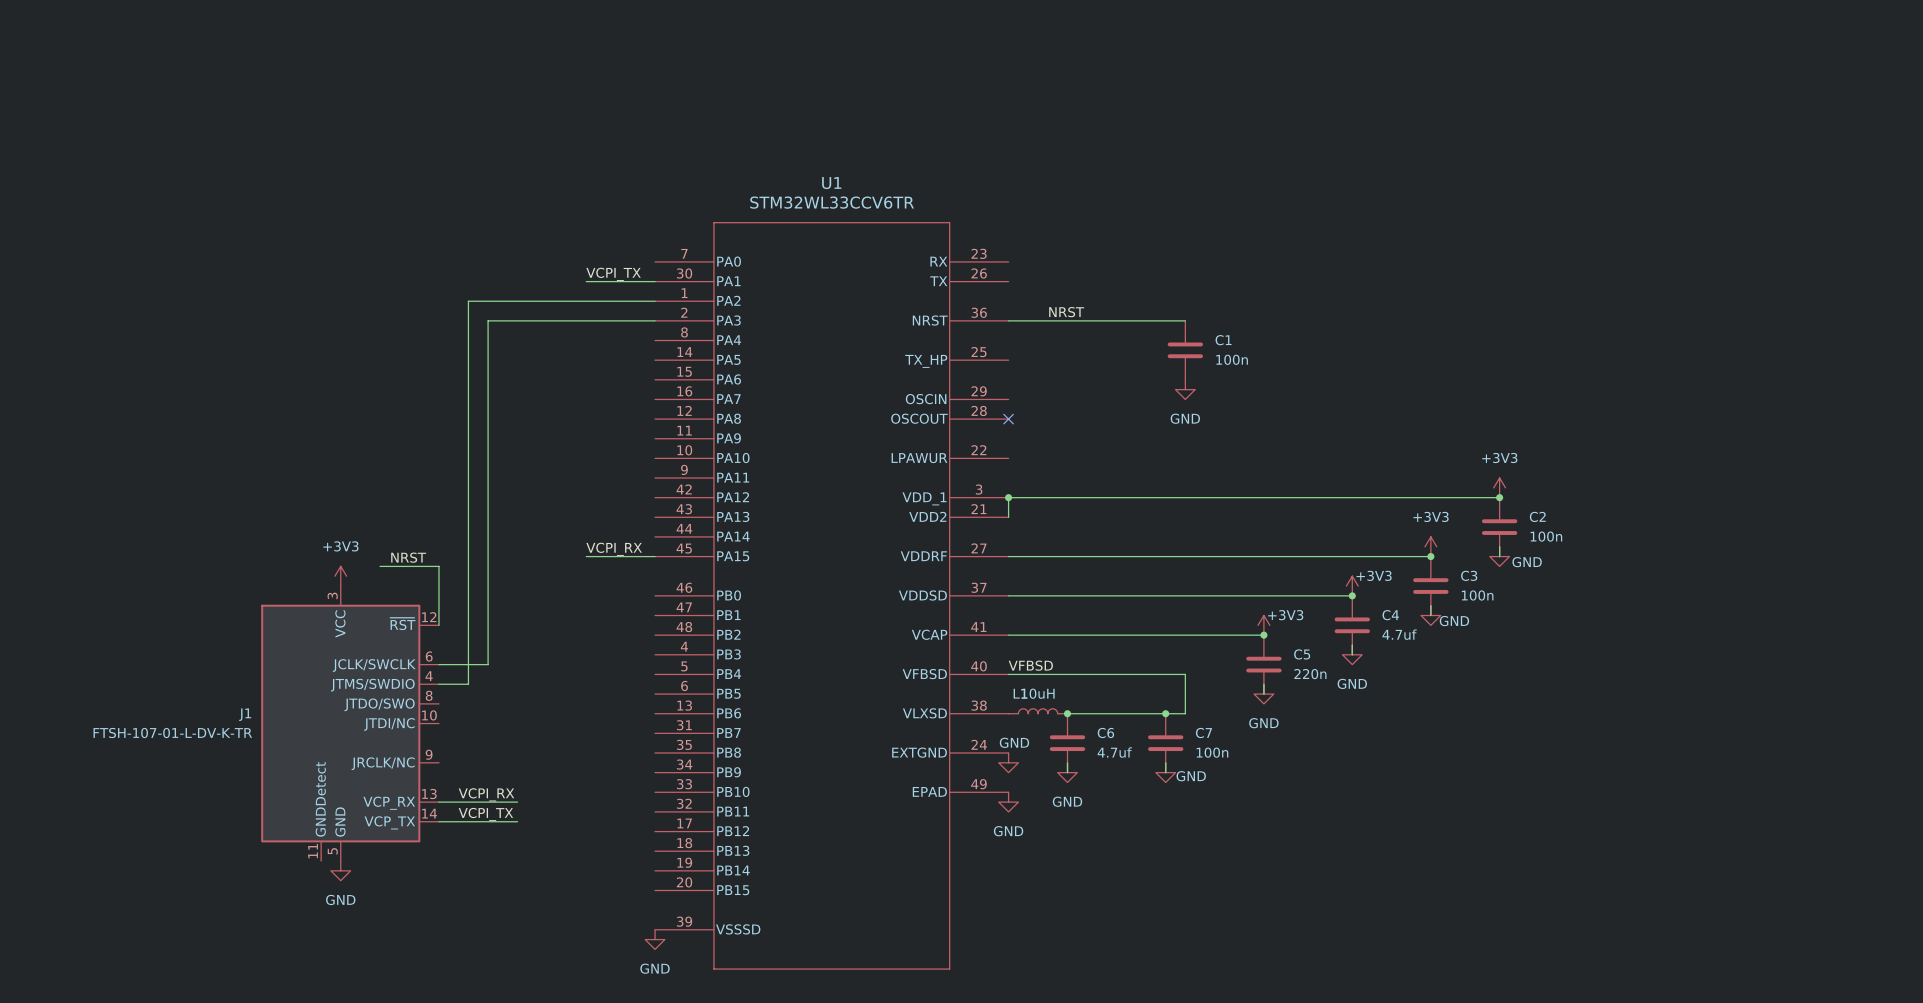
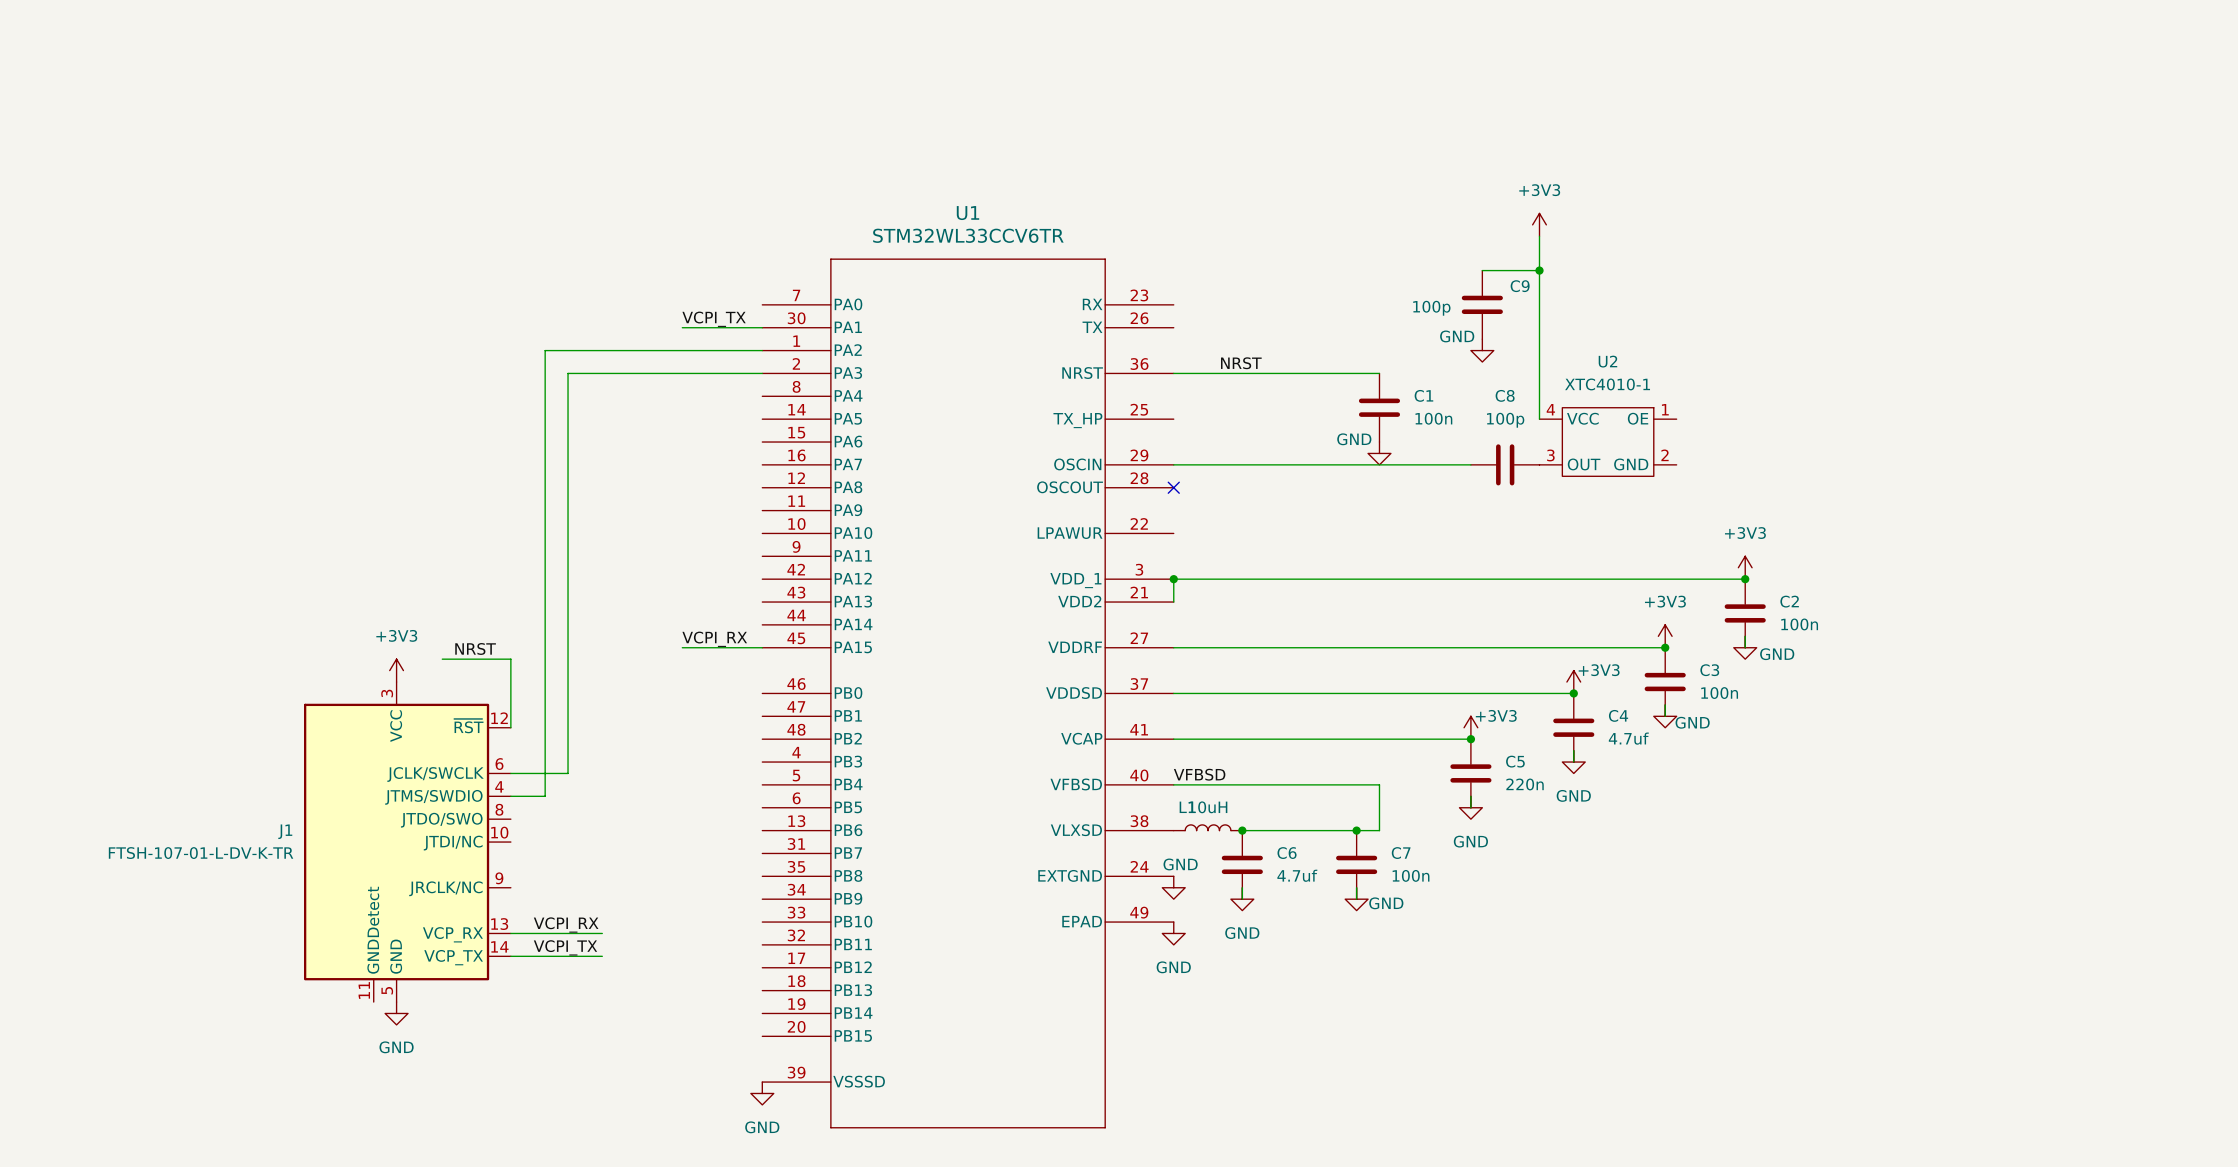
power symbol: none -> +3V3 (1539, 224)
wire: none -> (1539, 236) (1539, 419)
wire: none -> (1482, 270) (1539, 270)
junction: none -> (1539, 270)
C9: none -> 100p (1482, 304)
power symbol: none -> GND (1482, 350)
U2: none -> XTC4010-1 (1608, 442)
wire: none -> (1173, 464) (1470, 464)
C8: none -> 100p (1505, 464)
power symbol text position: GND (1185, 418) -> GND (1354, 439)

